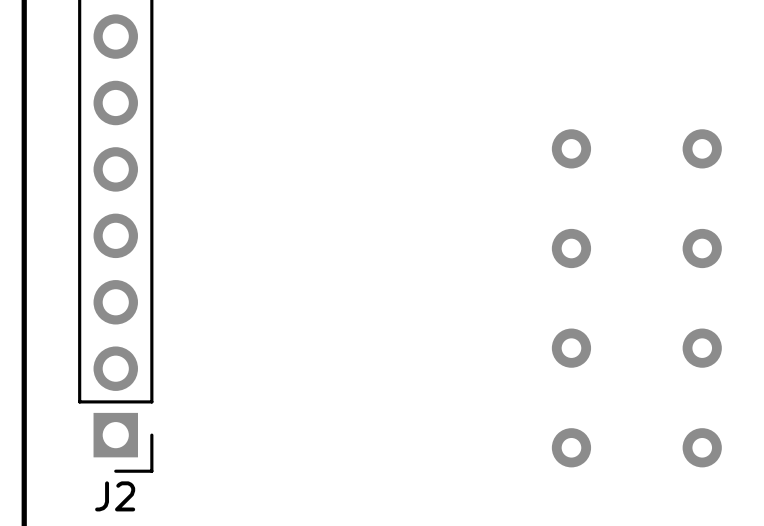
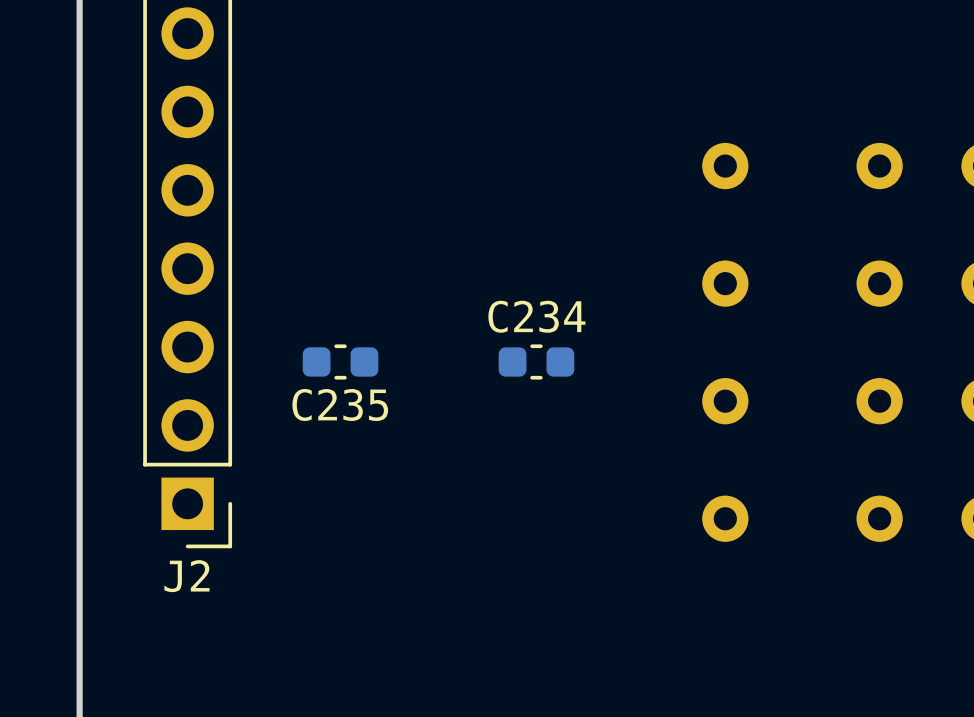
C235: none -> (340, 361)
C234: none -> (536, 361)

